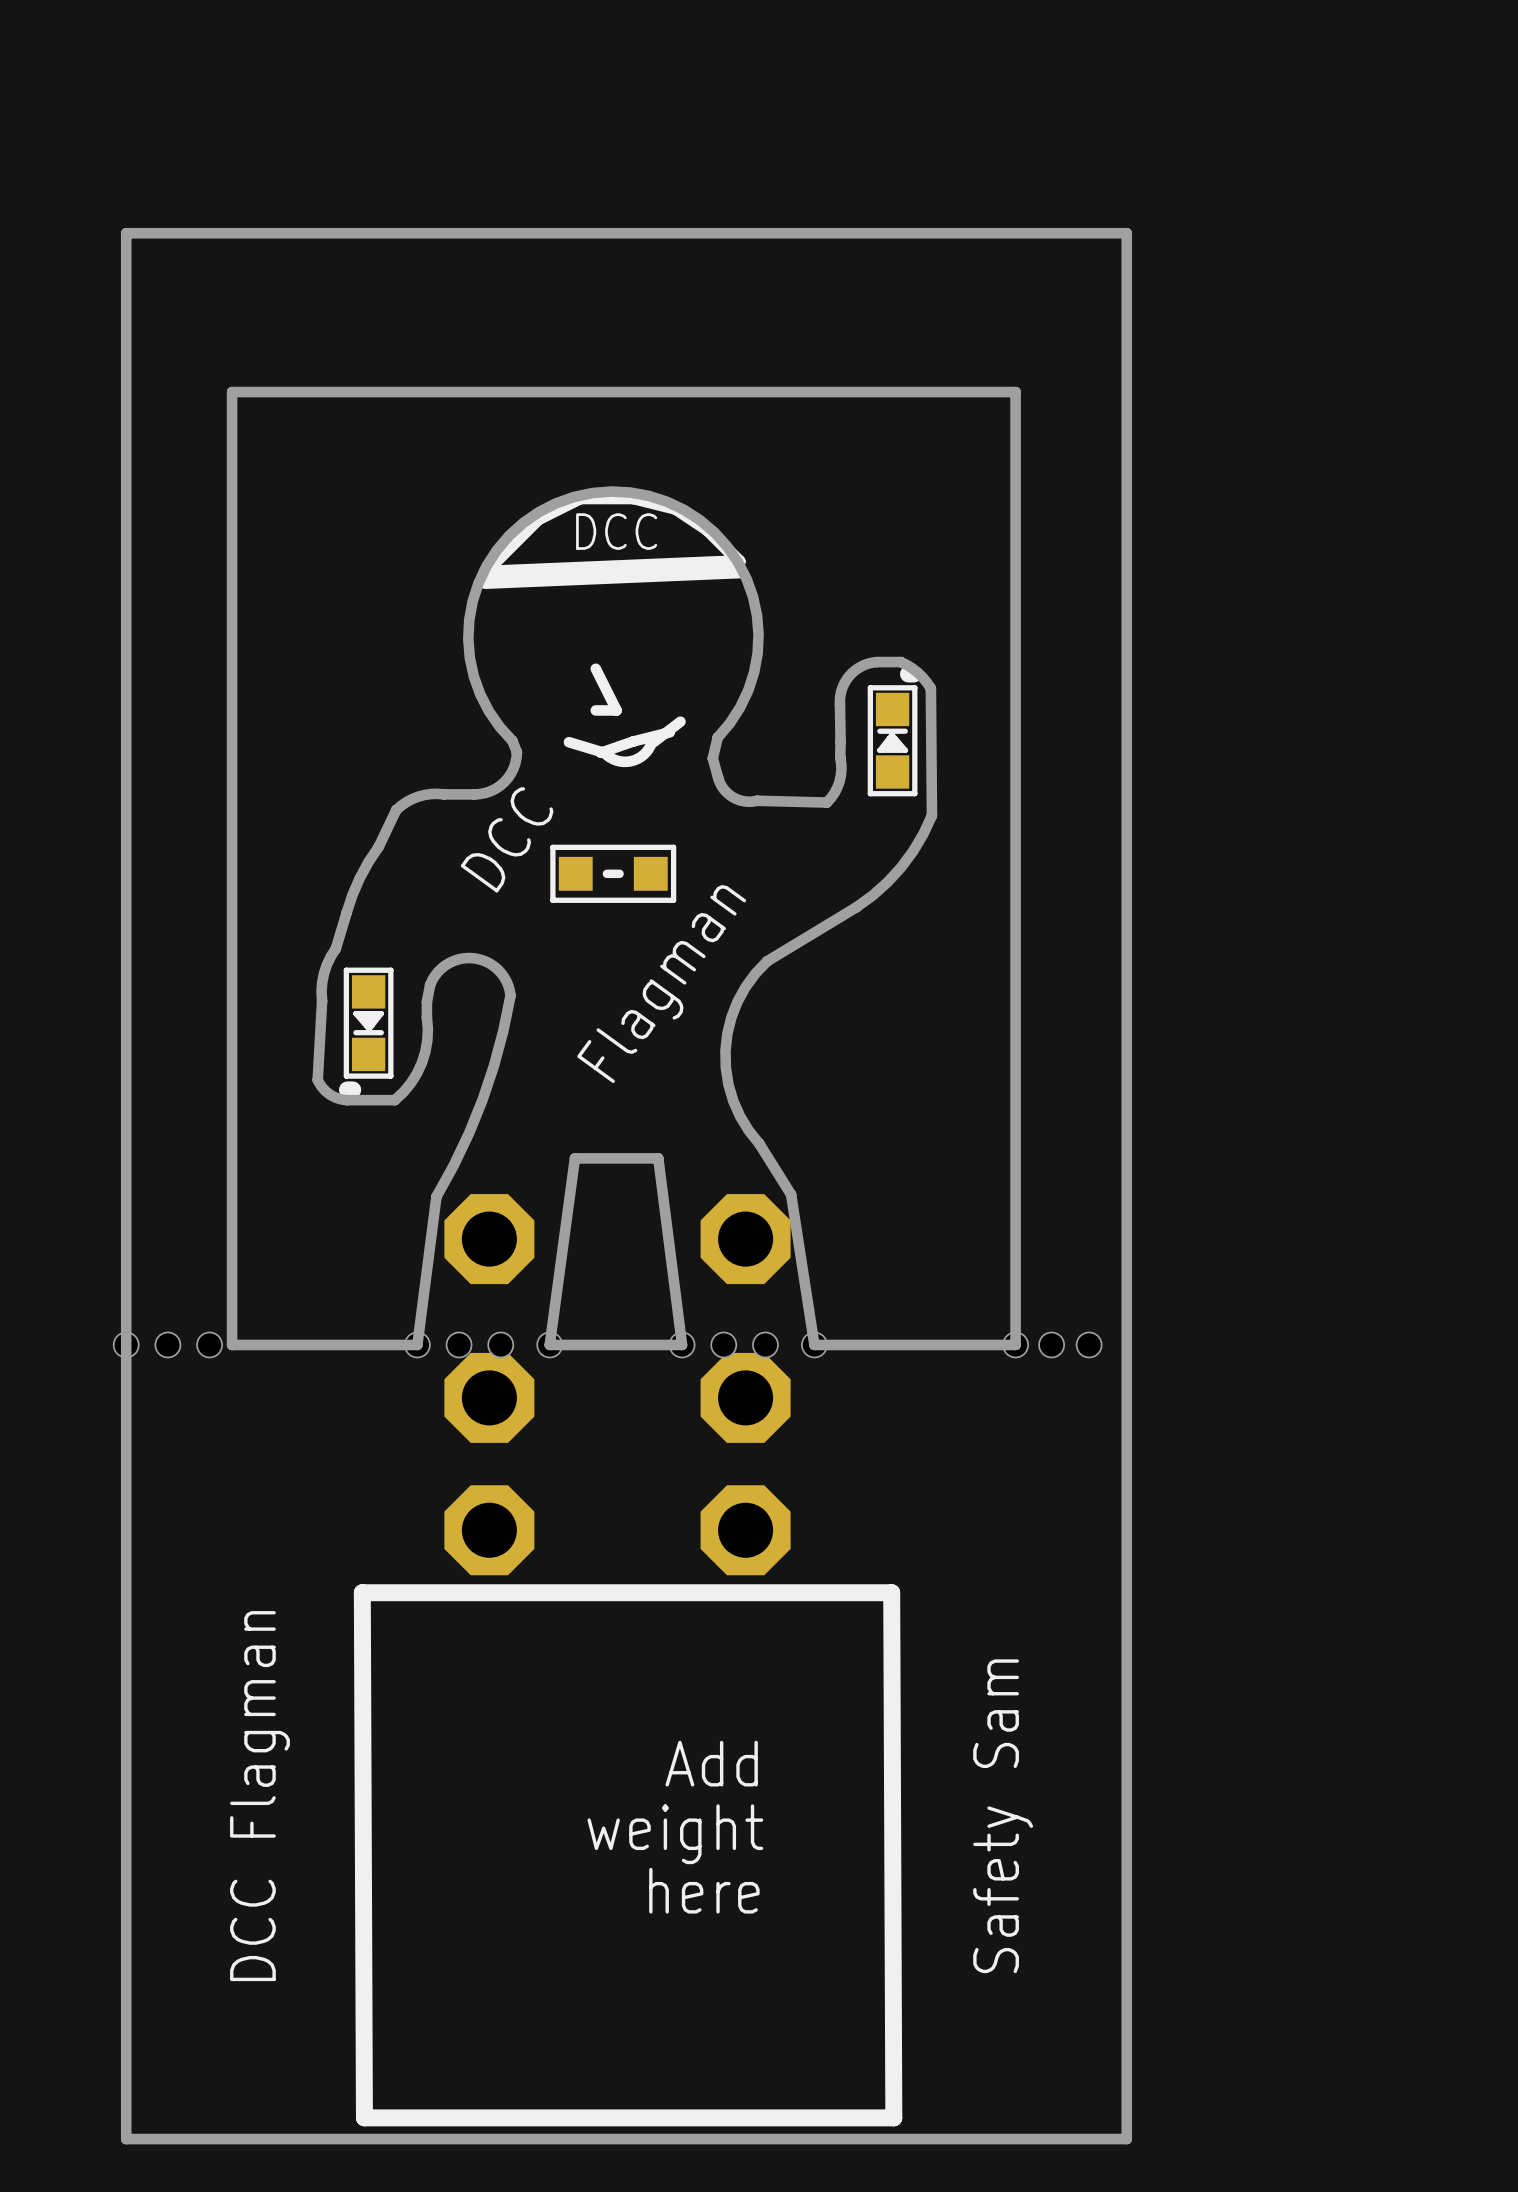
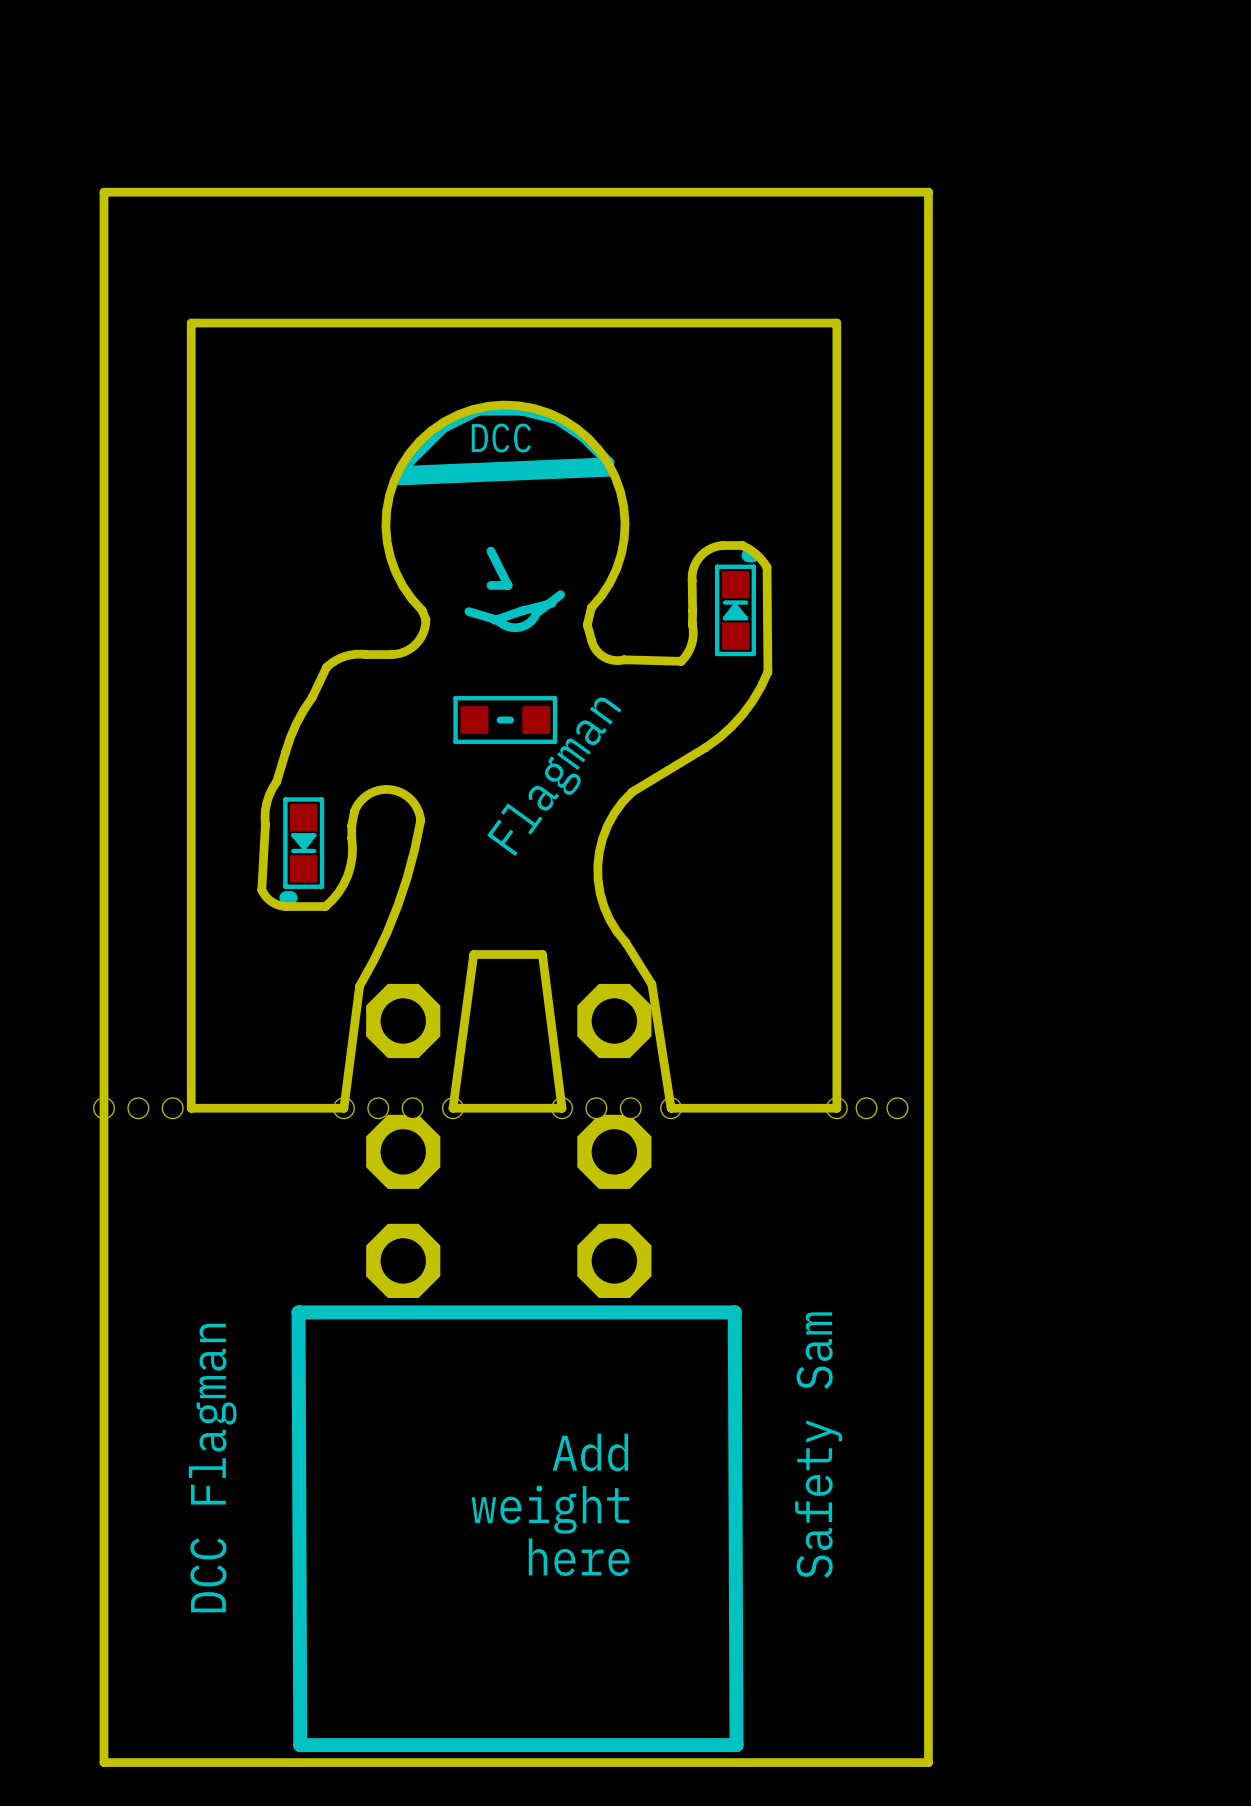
text: DCC (507, 839) -> none
text position: Flagman (661, 984) -> Flagman (554, 776)
text position: Safety Sam (1003, 1816) -> Safety Sam (818, 1445)

